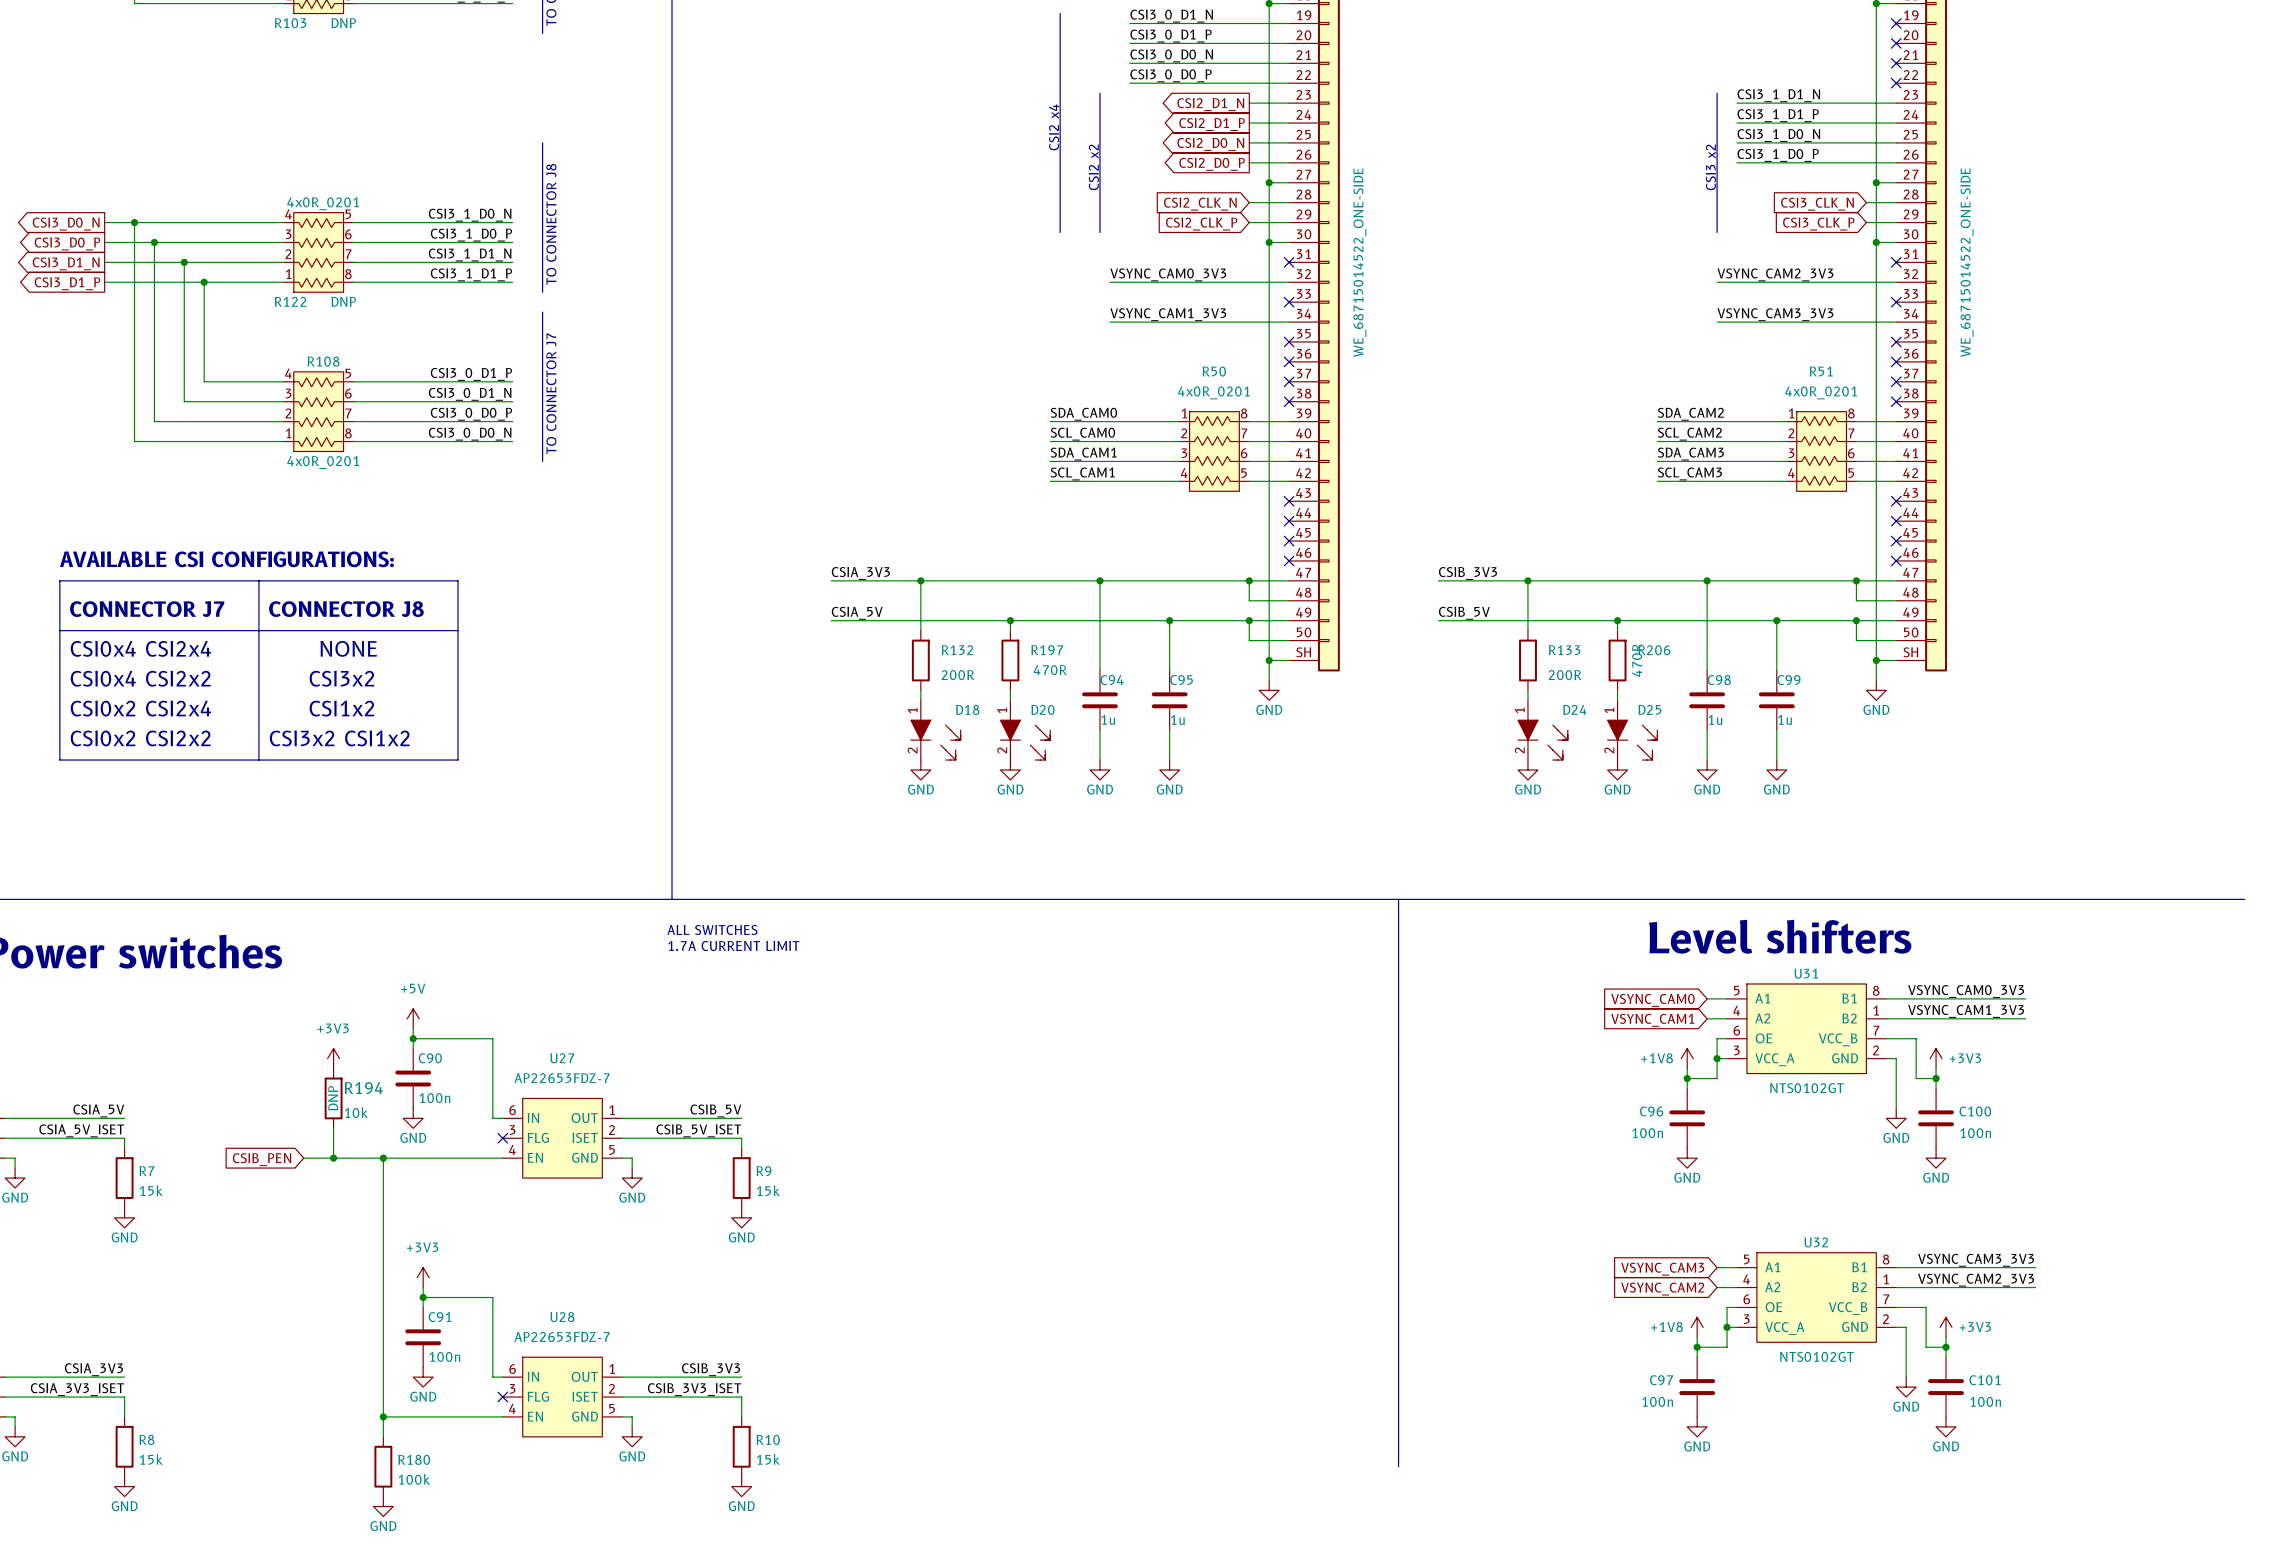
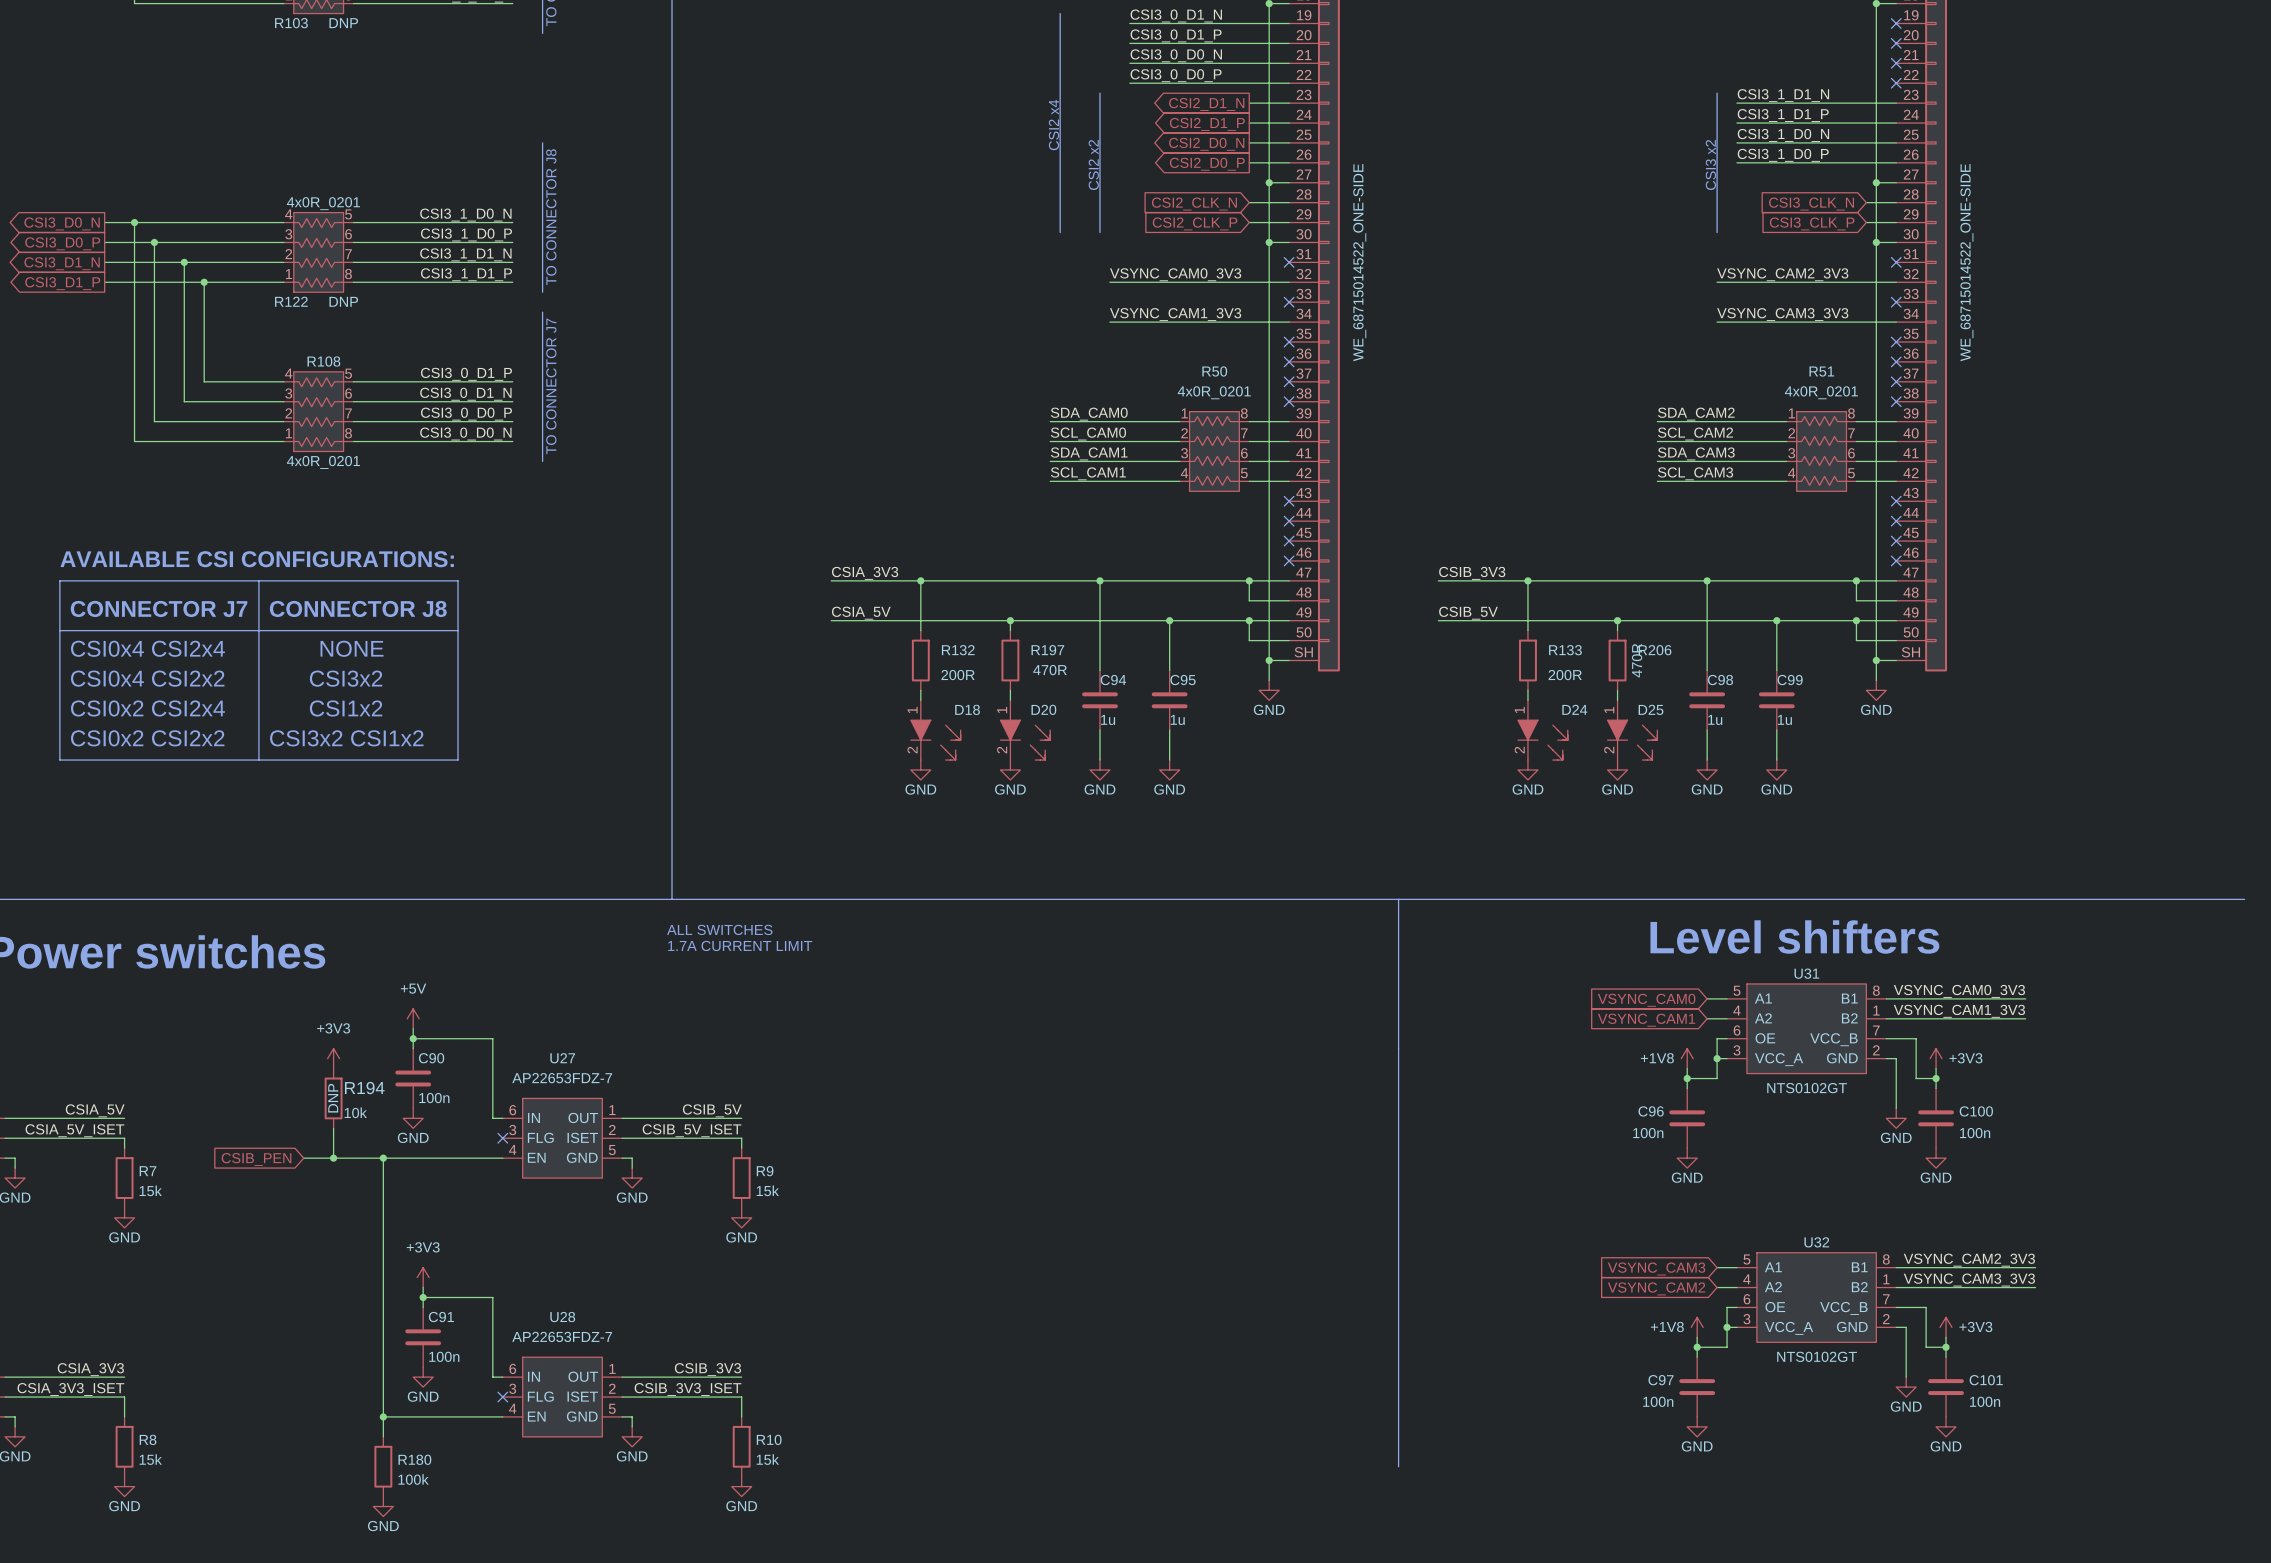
label: VSYNC_CAM3_3V3 (1976, 1260) -> VSYNC_CAM2_3V3 (1969, 1260)
label: VSYNC_CAM2_3V3 (1976, 1280) -> VSYNC_CAM3_3V3 (1969, 1280)

